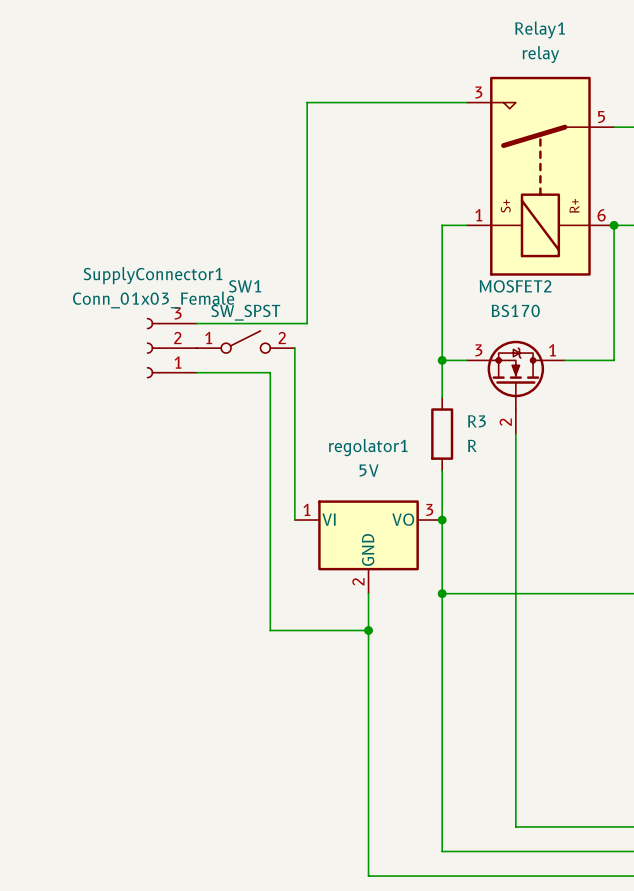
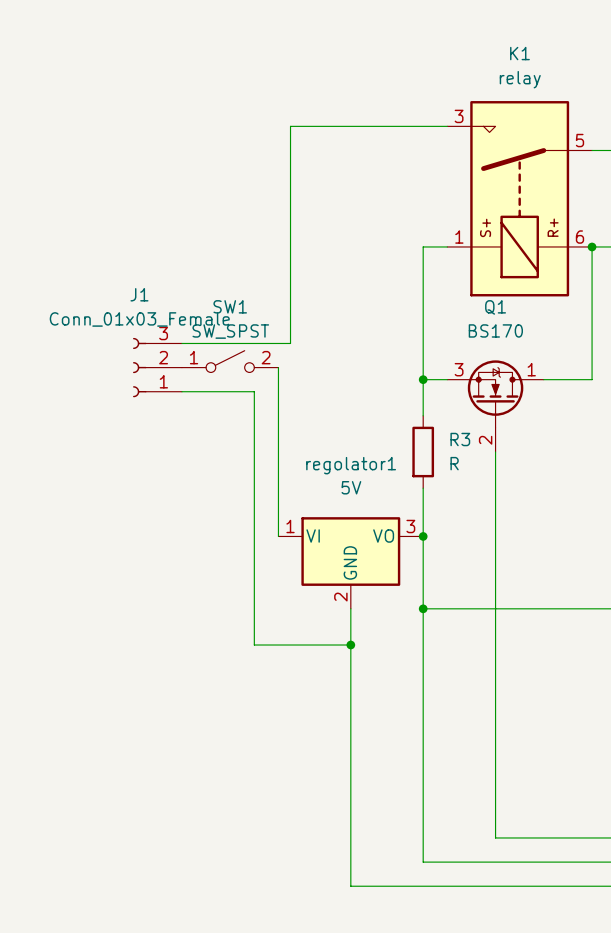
Relay1 name: Relay1 (540, 30) -> K1 (519, 53)
SupplyConnector1 name: SupplyConnector1 (153, 275) -> J1 (139, 294)
MOSFET2 name: MOSFET2 (515, 286) -> Q1 (495, 307)

